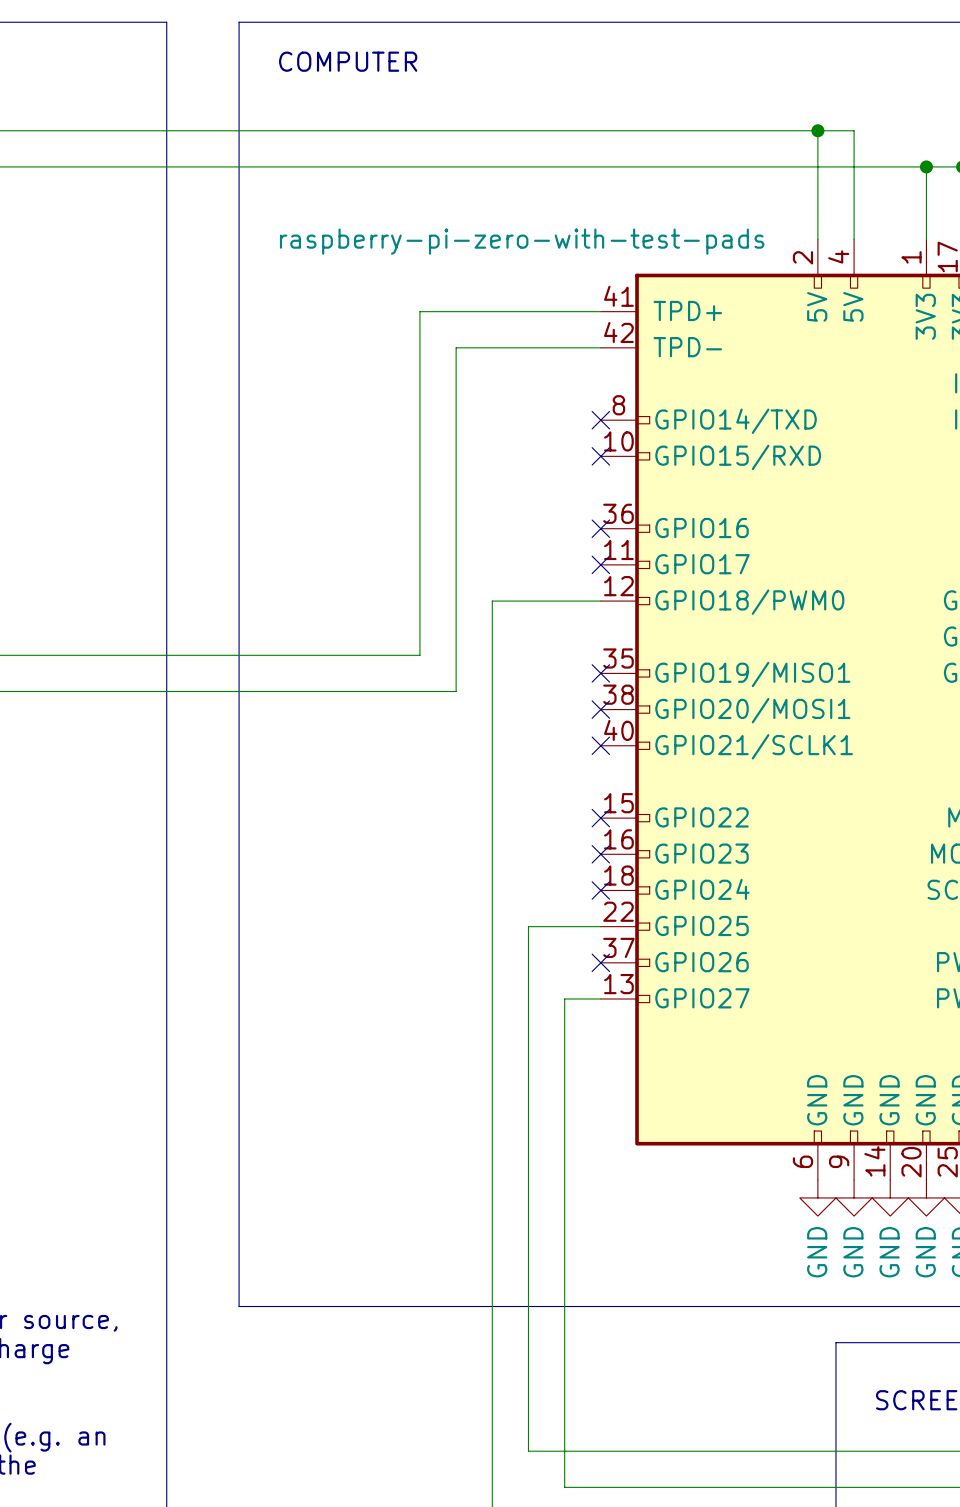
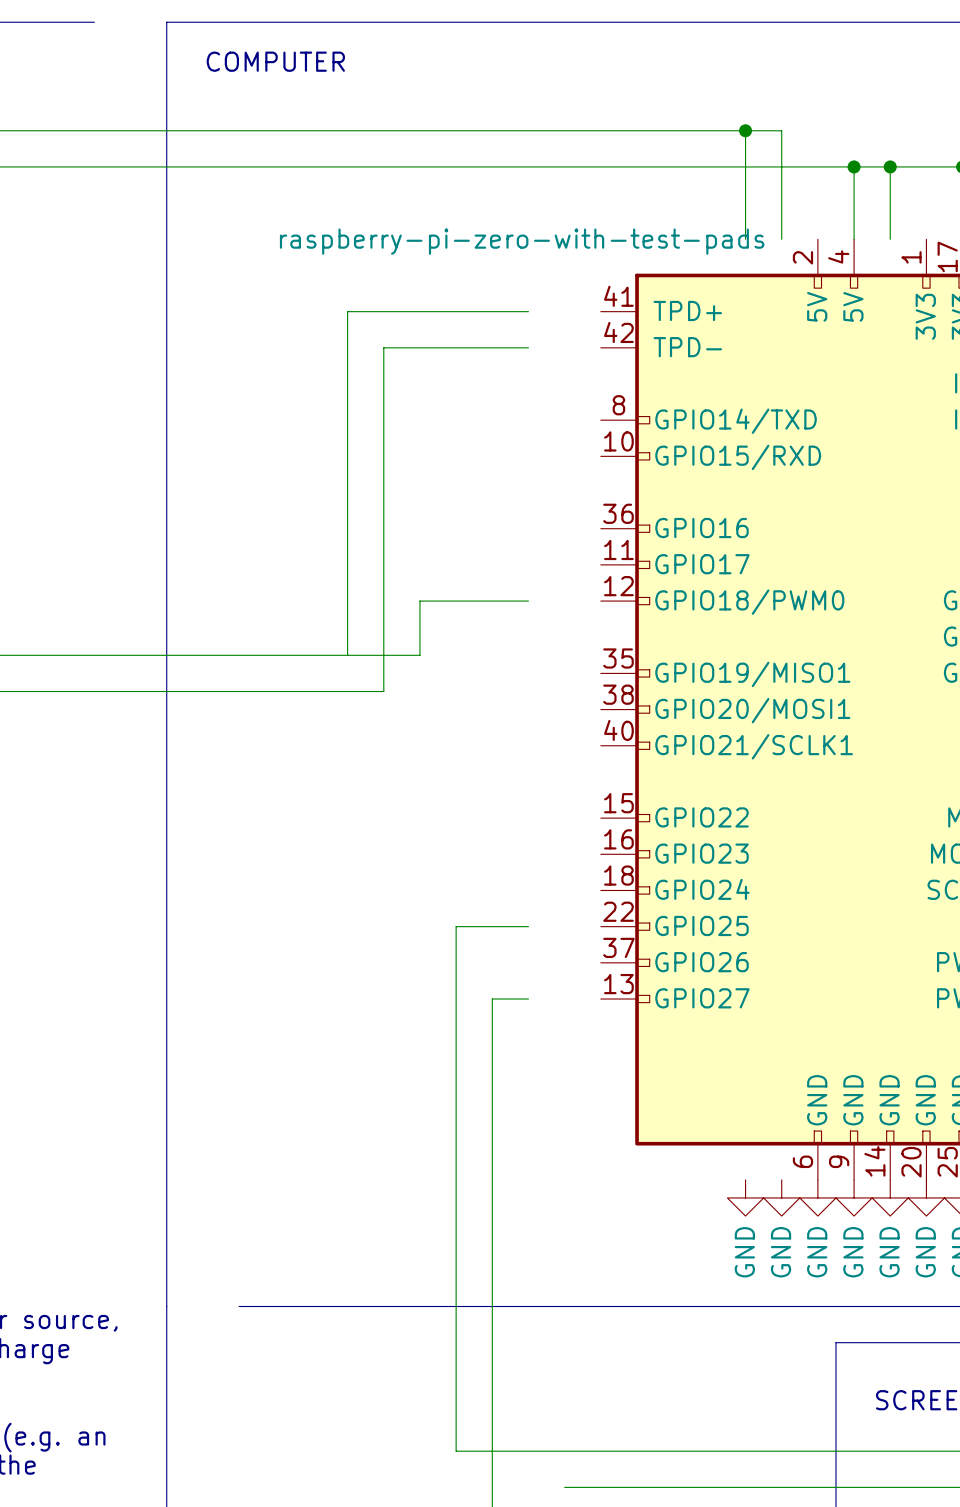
line: (94, 22) (166, 22) -> (239, 22) (166, 22)
line: (239, 22) (239, 1306) -> none
text position: COMPUTER (348, 61) -> COMPUTER (275, 61)
junction: none -> (745, 130)
wire: (781, 130) (854, 130) (854, 166) -> (781, 130) (781, 239)
wire: (817, 130) (817, 239) -> (745, 130) (745, 239)
junction: (817, 130) -> none
junction: none -> (854, 166)
junction: none -> (890, 166)
wire: (926, 166) (926, 239) -> (890, 166) (890, 239)
junction: (926, 166) -> none
wire: (419, 311) (419, 601) -> (419, 311) (347, 311) (347, 655)
wire: (528, 311) (600, 311) -> none
wire: (456, 347) (456, 691) (383, 691) -> (456, 347) (383, 347) (383, 691)
wire: (528, 347) (600, 347) -> none
no-connect mark: (600, 420) -> none
no-connect mark: (600, 456) -> none
no-connect mark: (600, 528) -> none
no-connect mark: (600, 564) -> none
wire: (492, 601) (492, 999) -> (528, 999) (492, 999)
wire: (528, 601) (600, 601) -> (419, 601) (492, 601)
no-connect mark: (600, 673) -> none
no-connect mark: (600, 709) -> none
no-connect mark: (600, 745) -> none
no-connect mark: (600, 818) -> none
no-connect mark: (600, 854) -> none
no-connect mark: (600, 890) -> none
wire: (600, 926) (528, 926) (528, 1451) -> (528, 926) (456, 926) (456, 1451) (528, 1451)
no-connect mark: (600, 962) -> none
wire: (600, 999) (564, 999) (564, 1487) -> none
power symbol: none -> GND (745, 1197)
power symbol: none -> GND (781, 1197)

